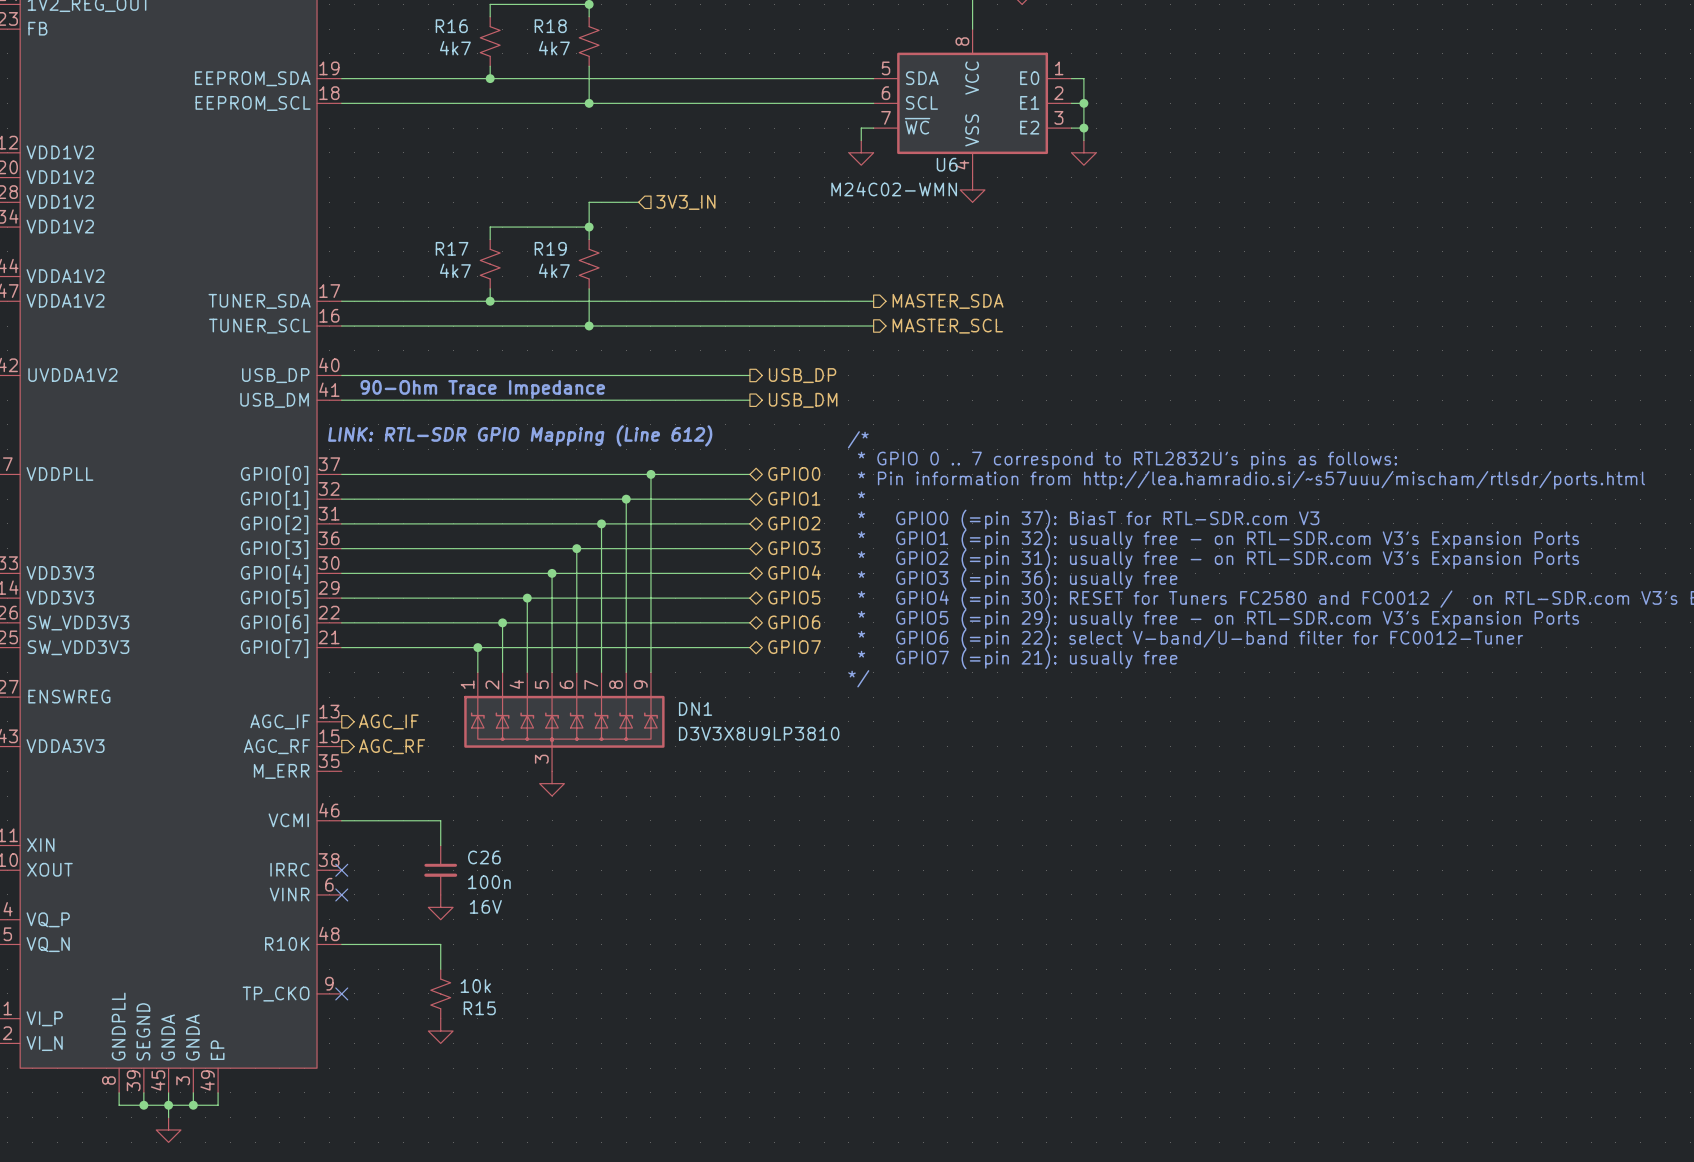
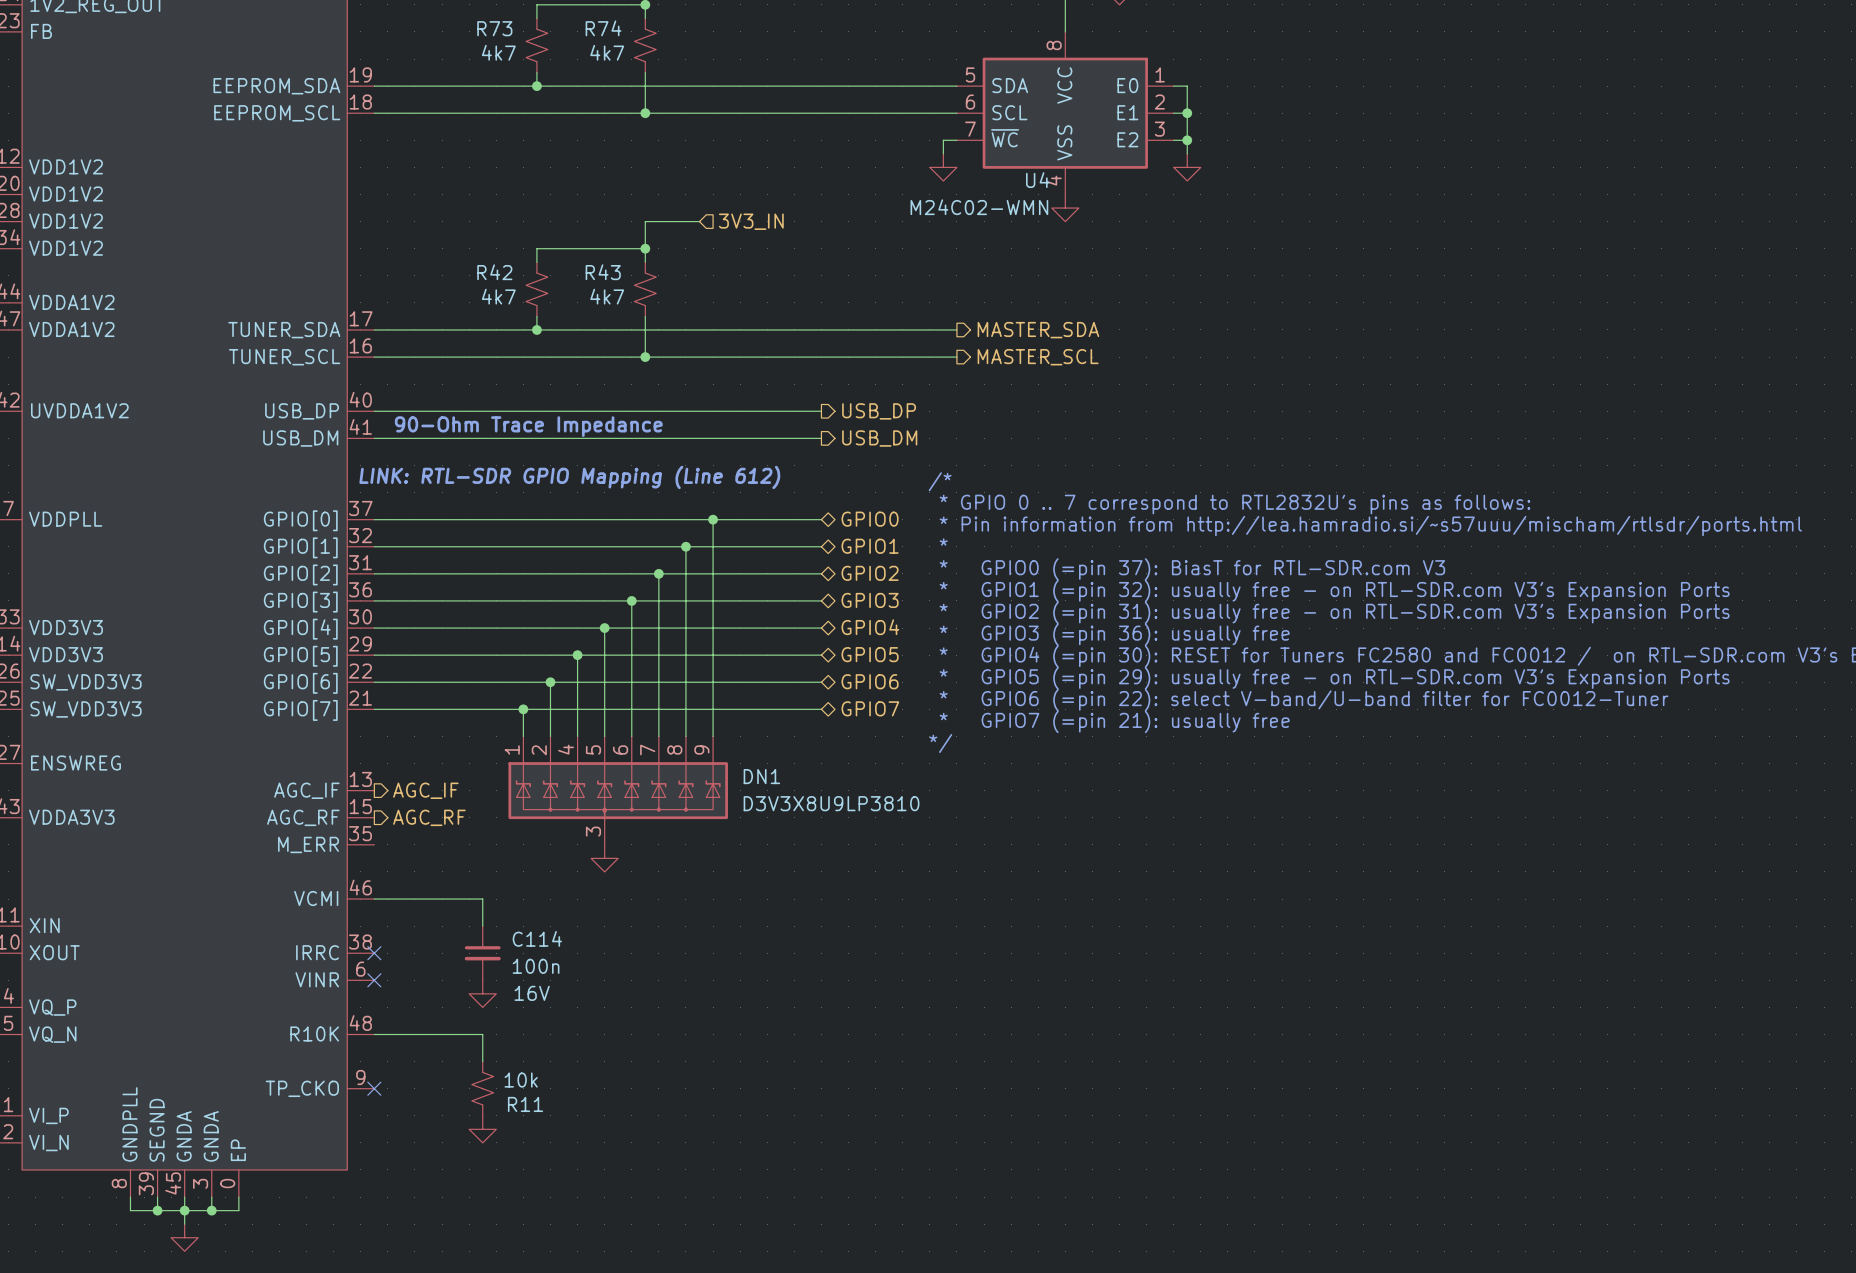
R16 name: R16 (451, 26) -> R73 (494, 28)
R18 name: R18 (550, 26) -> R74 (603, 28)
U6 name: U6 (947, 164) -> U4 (1037, 180)
R17 name: R17 (452, 248) -> R42 (494, 272)
R19 name: R19 (550, 248) -> R43 (603, 272)
C26 name: C26 (484, 857) -> C114 (537, 938)
R15 name: R15 (479, 1008) -> R11 (525, 1104)
part pin number: 49 (207, 1080) -> 0 (227, 1183)

